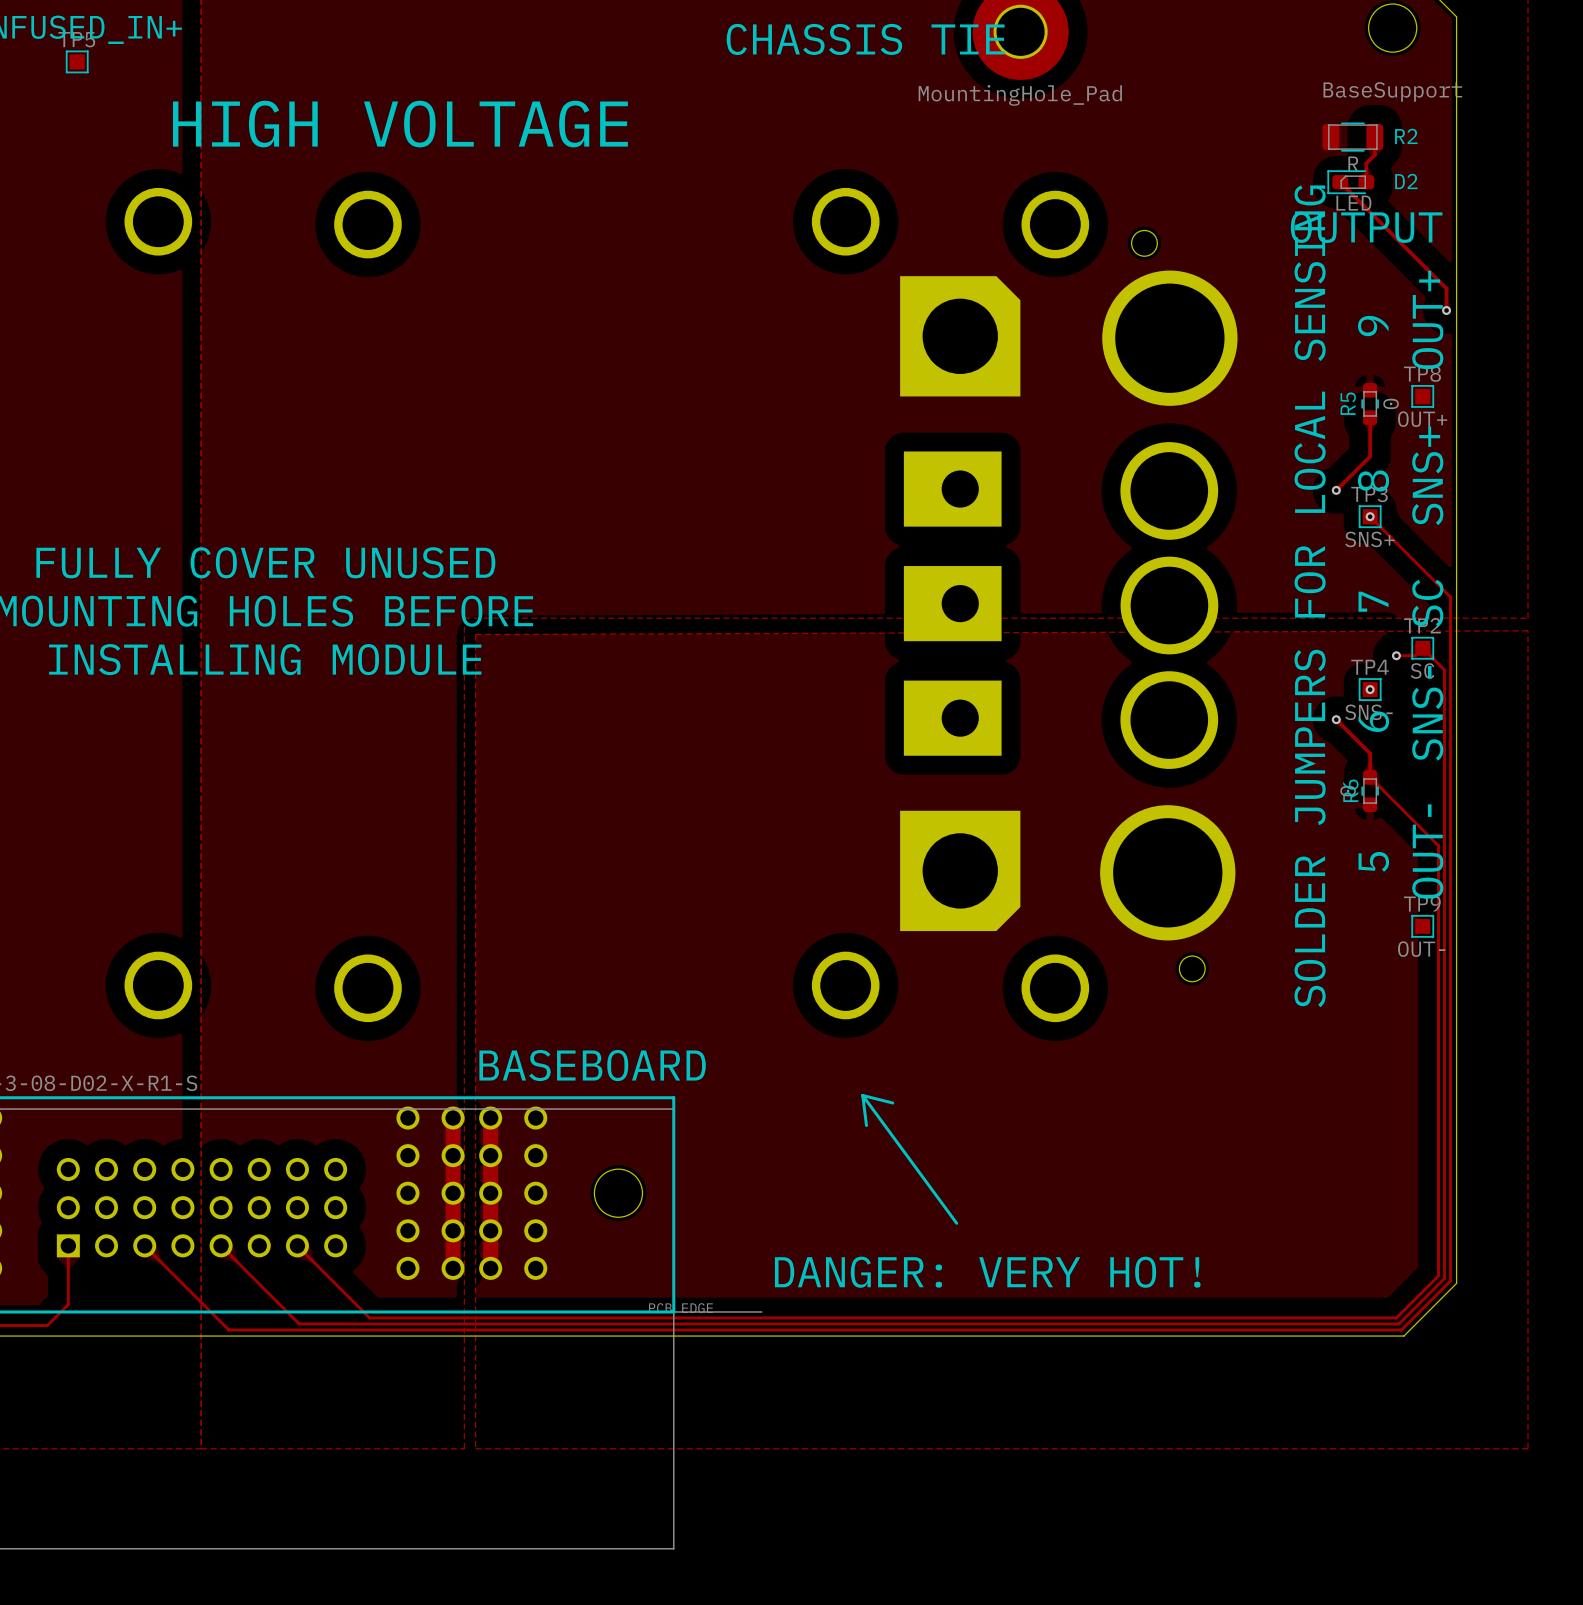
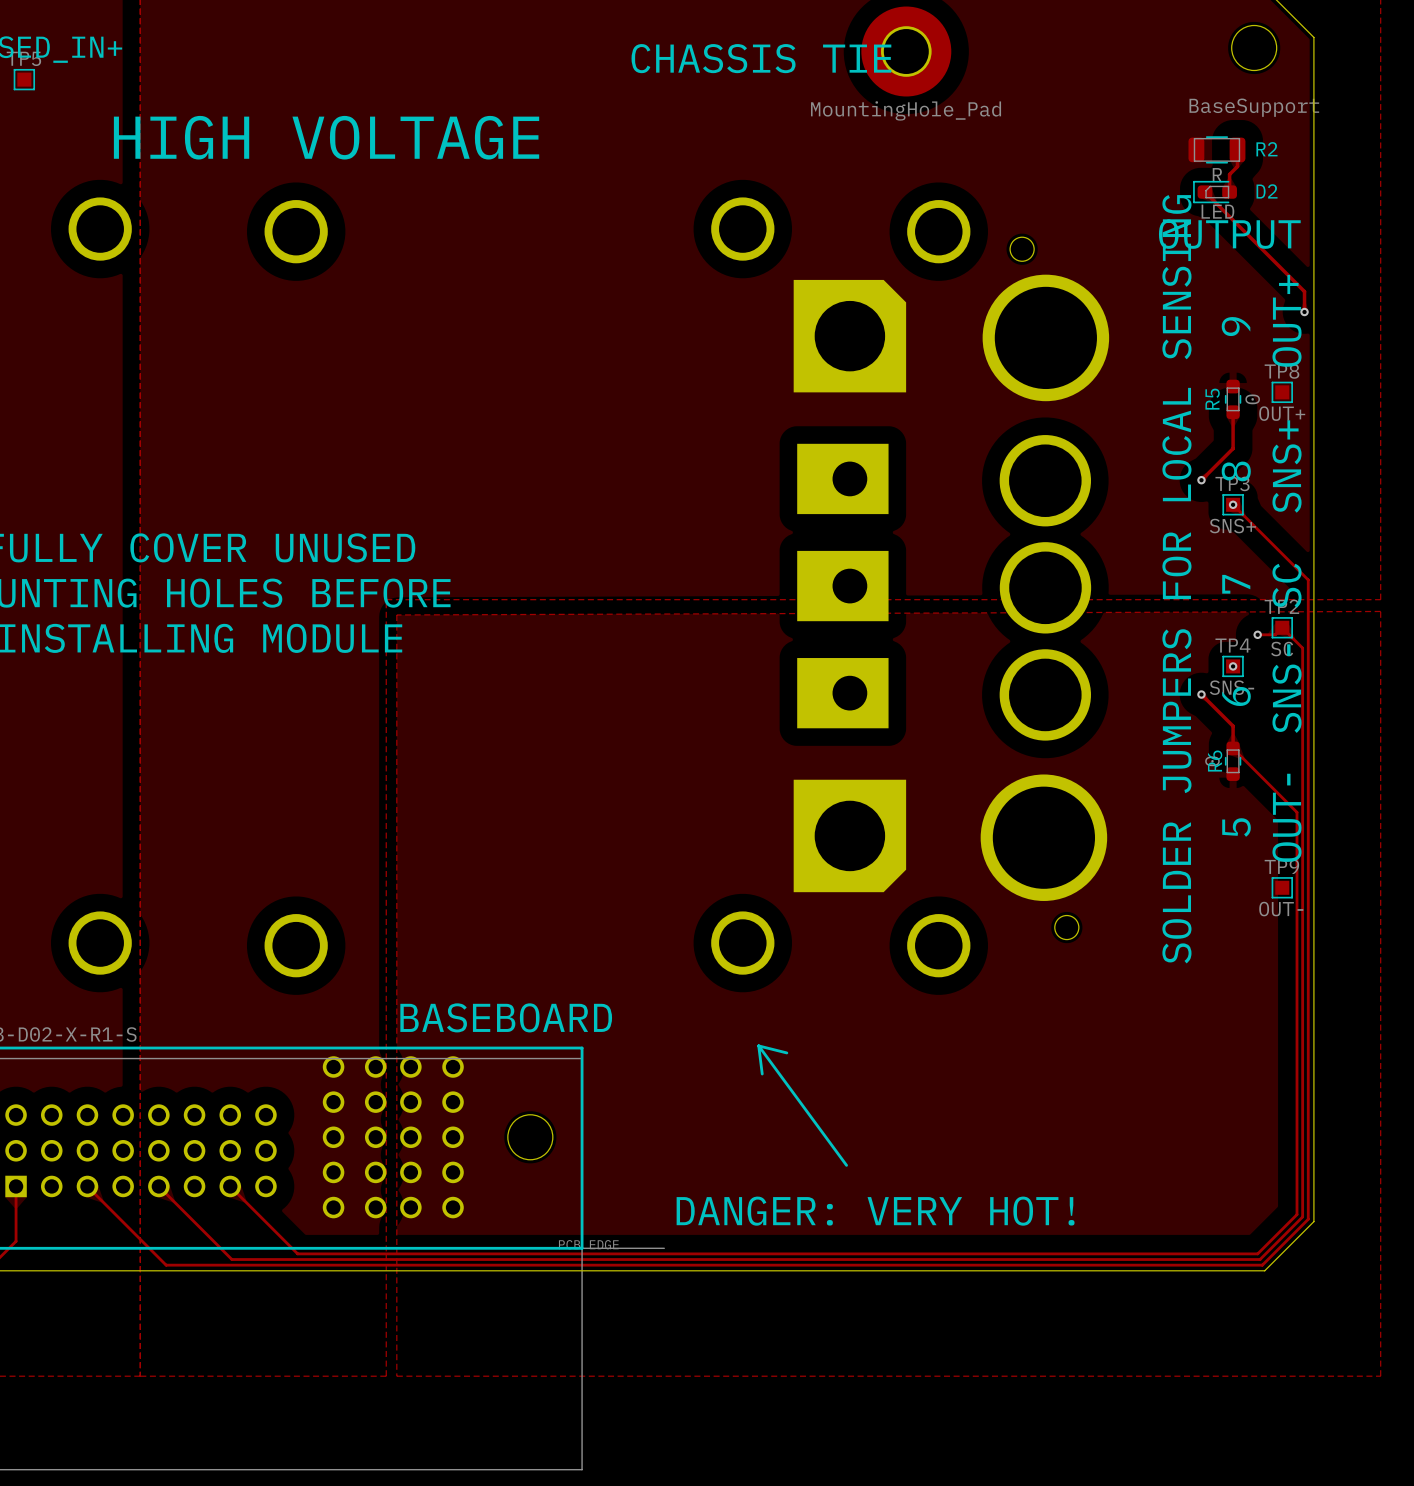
track: (453, 1118) (453, 1268) -> none
track: (490, 1118) (490, 1268) -> none

